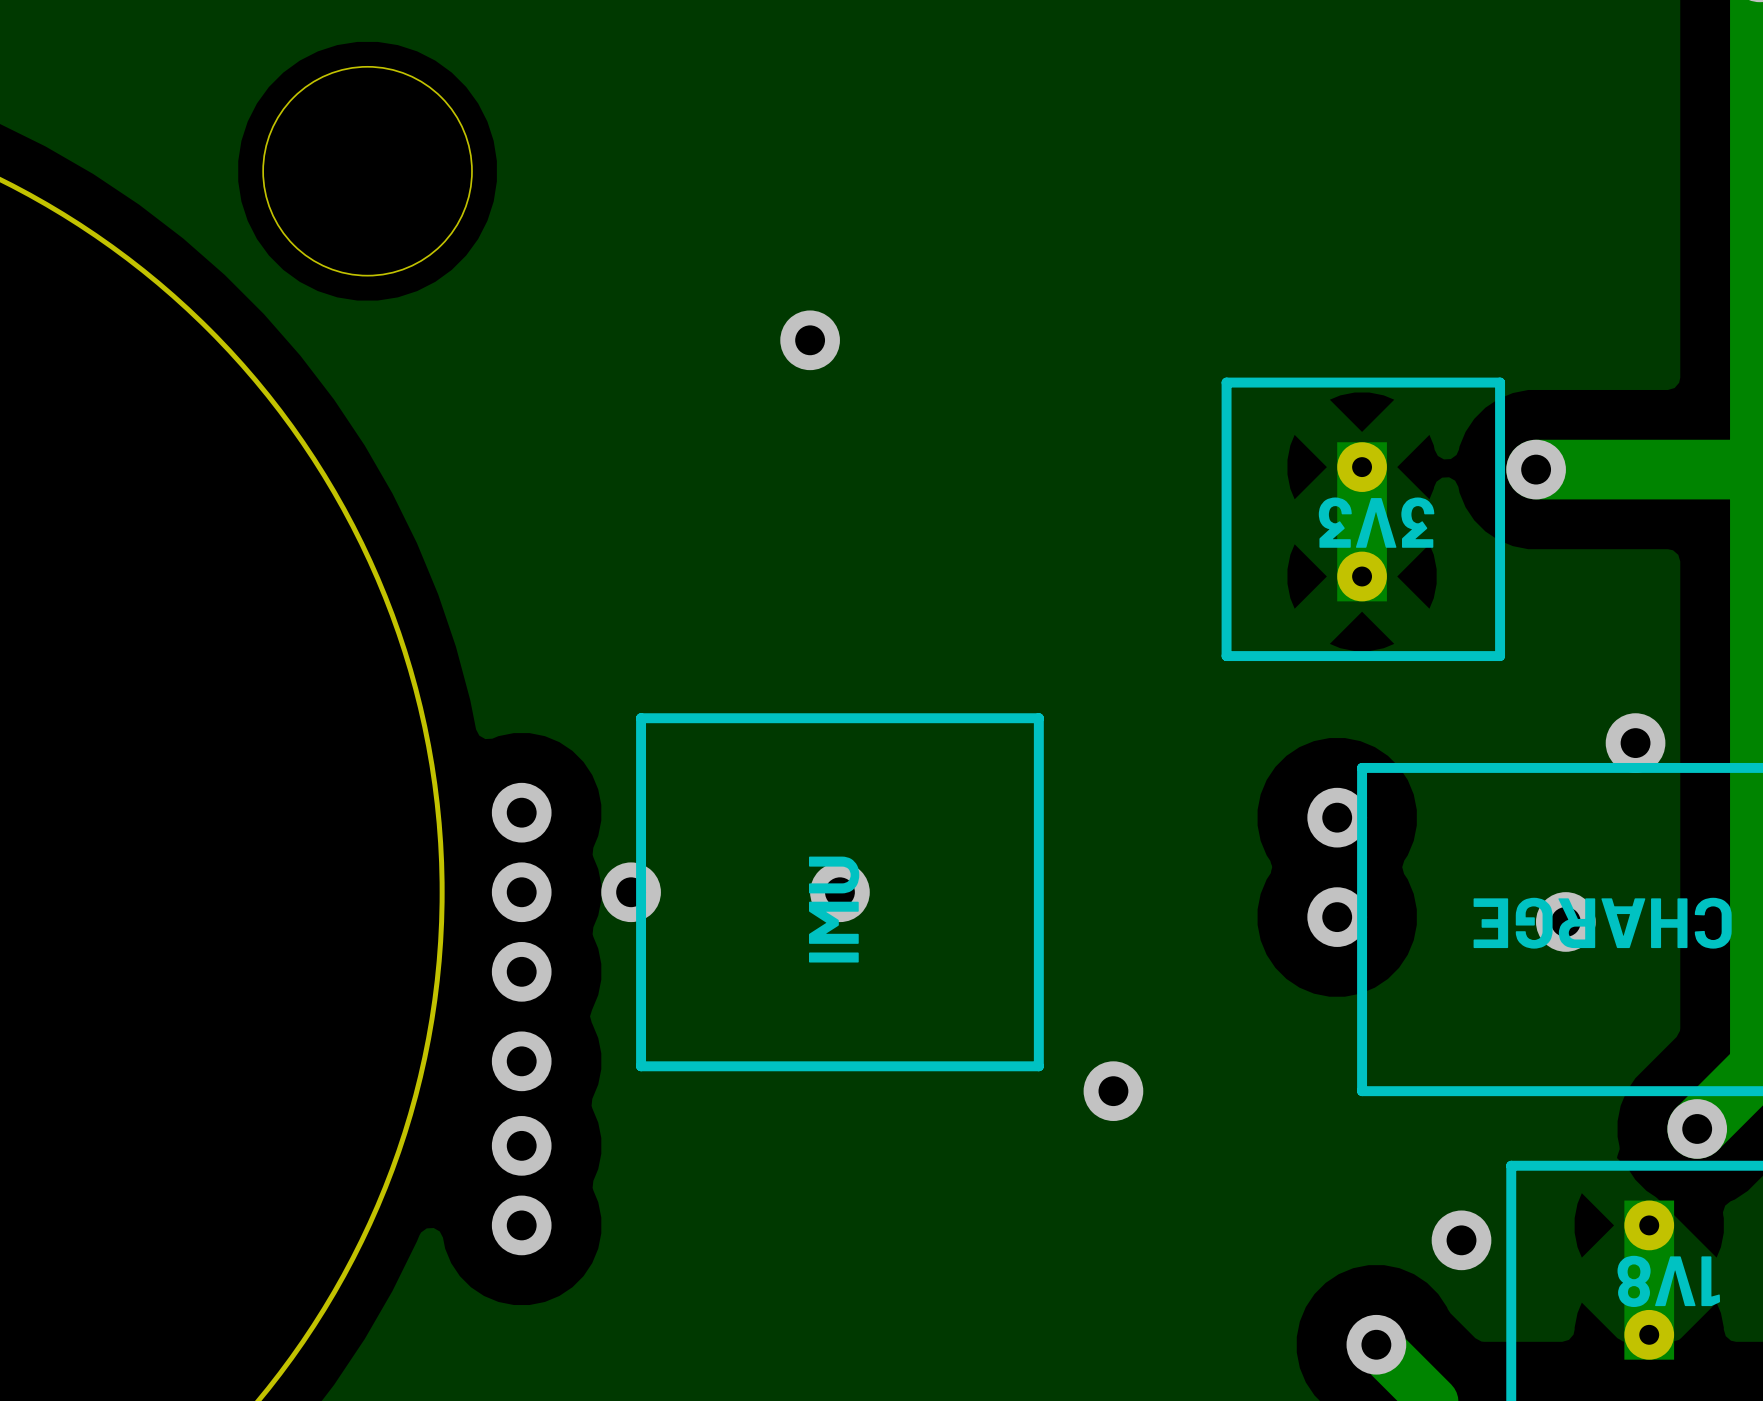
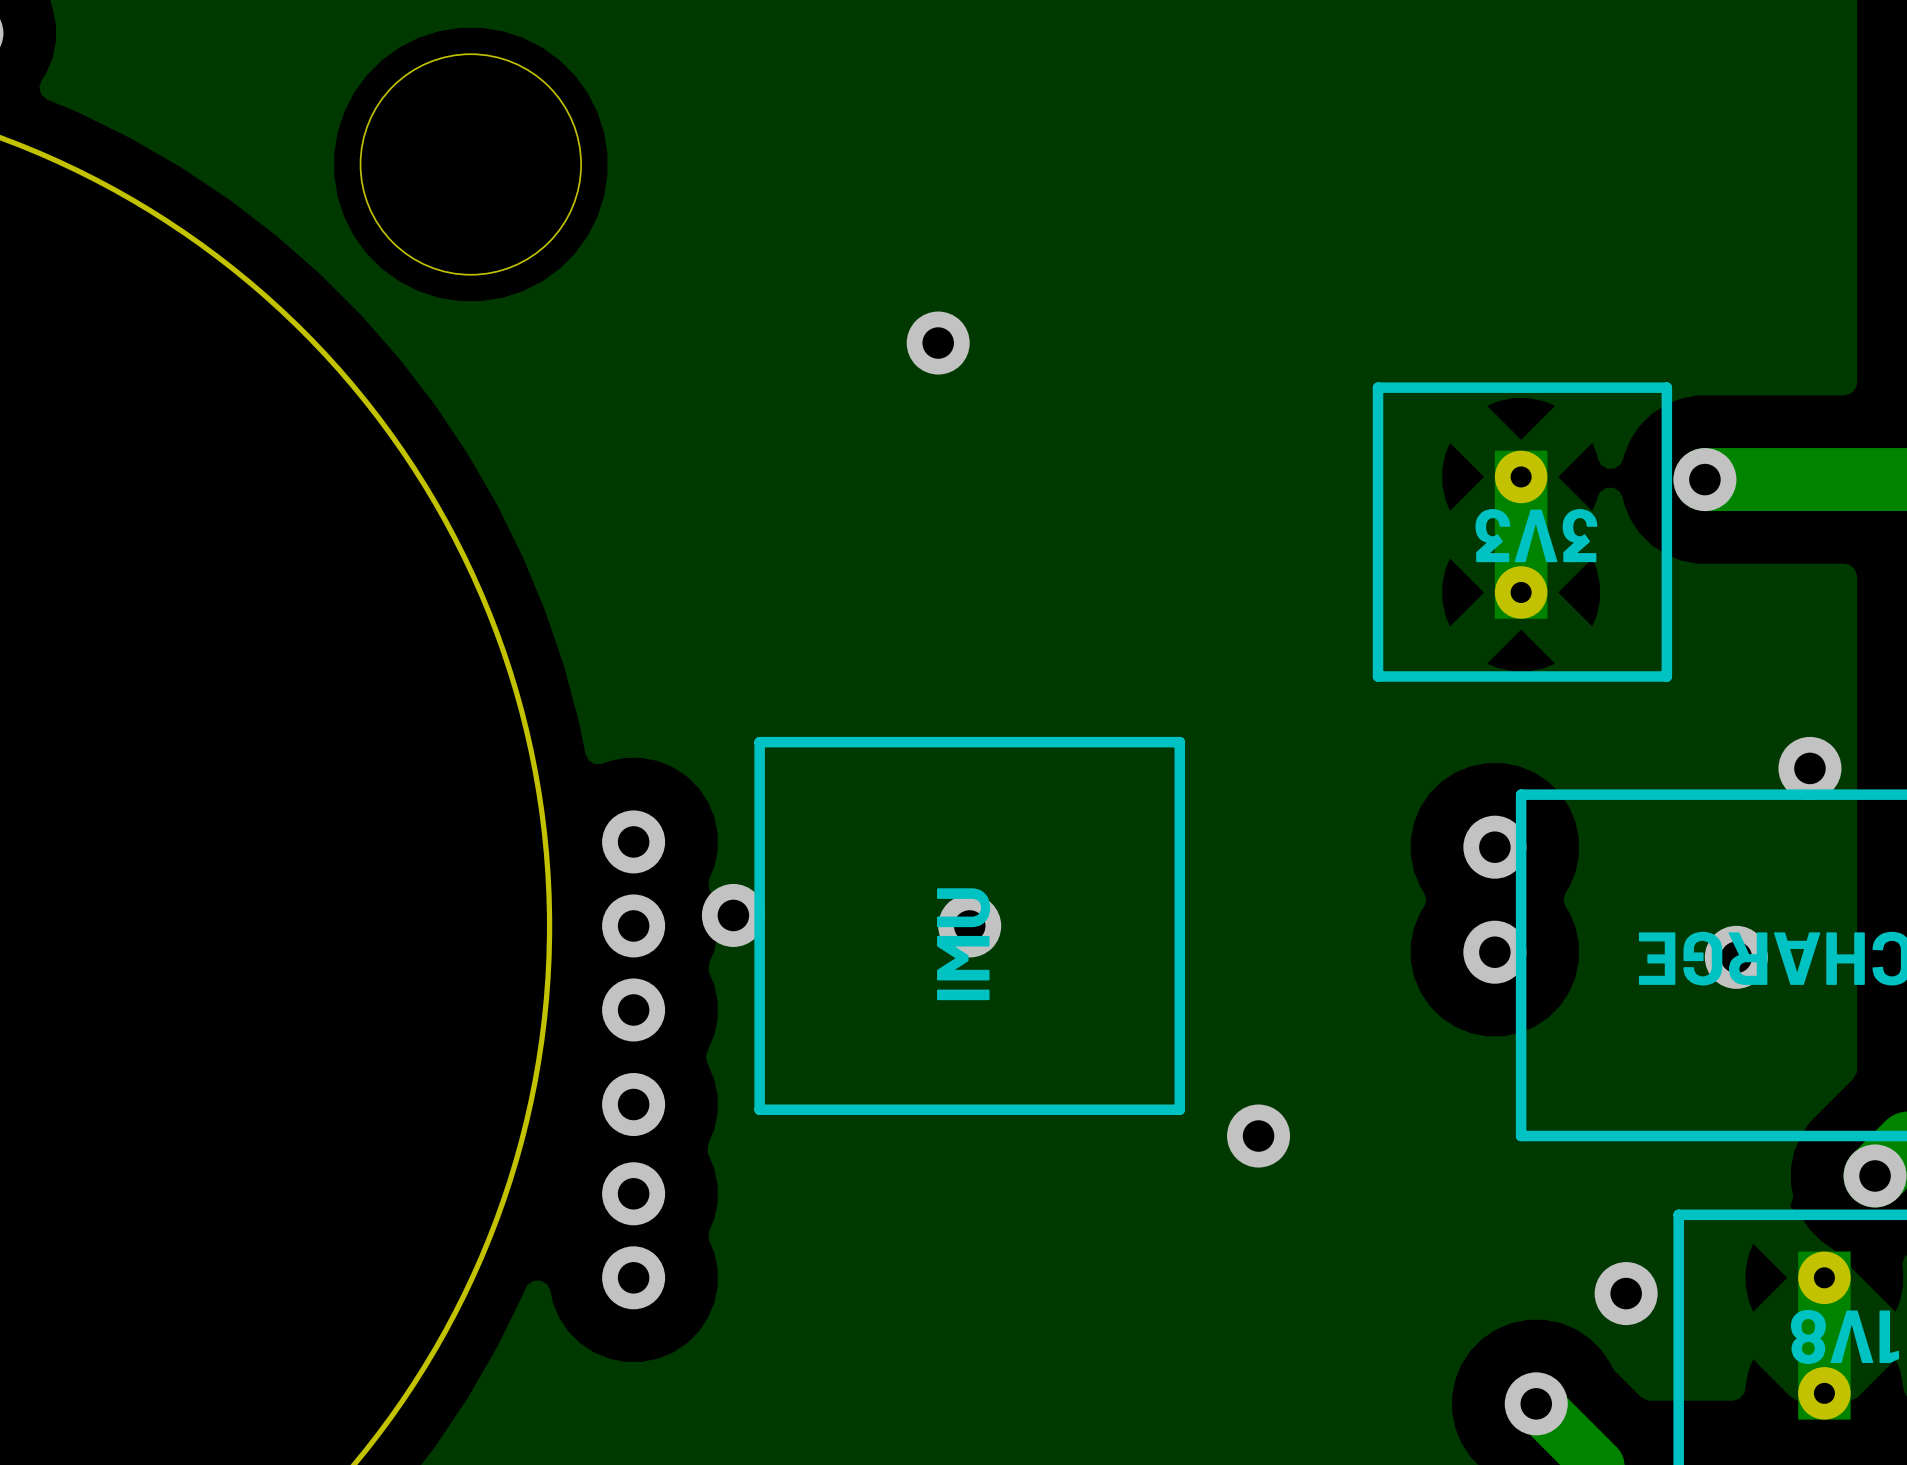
via position: (631, 892) -> (733, 915)

